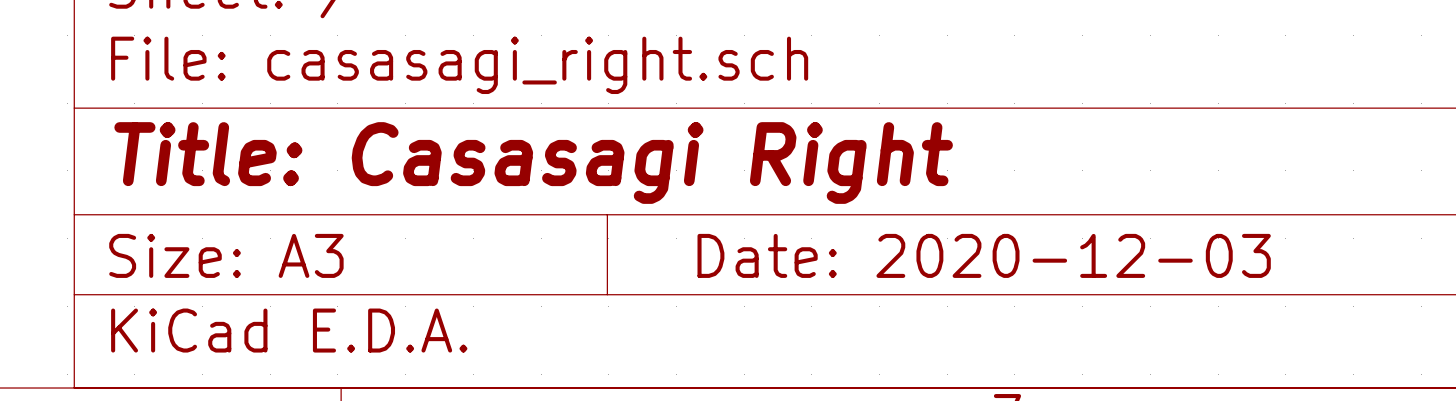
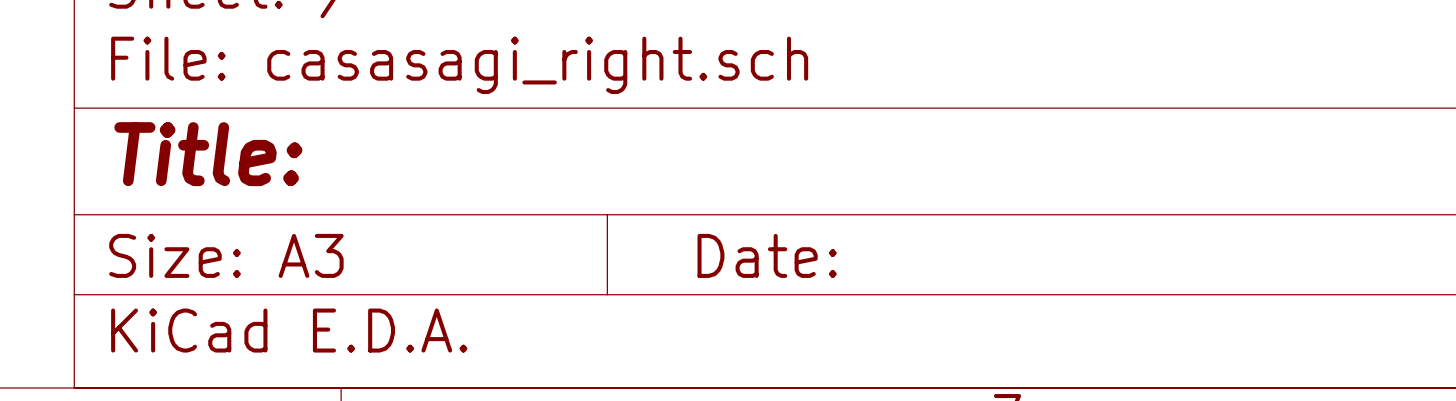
title block: Title: Casasagi Right (533, 163) -> Title: (208, 154)
title block: Date: 2020-12-03 (984, 255) -> Date: (767, 255)

